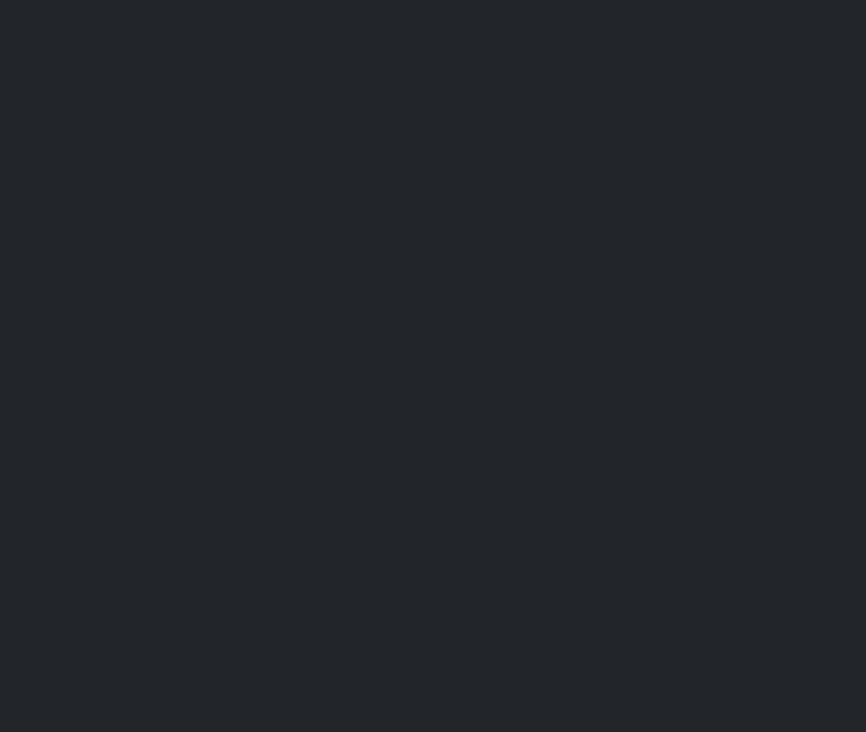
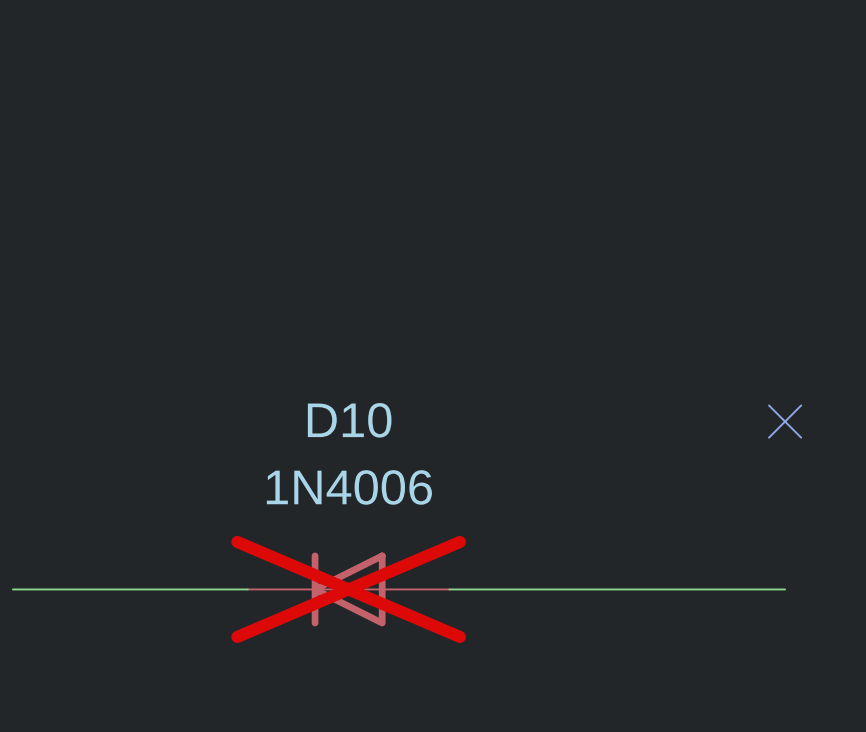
no-connect mark: none -> (785, 421)
wire: none -> (12, 589) (247, 589)
D10: none -> 1N4006 (348, 589)
wire: none -> (449, 589) (785, 589)

